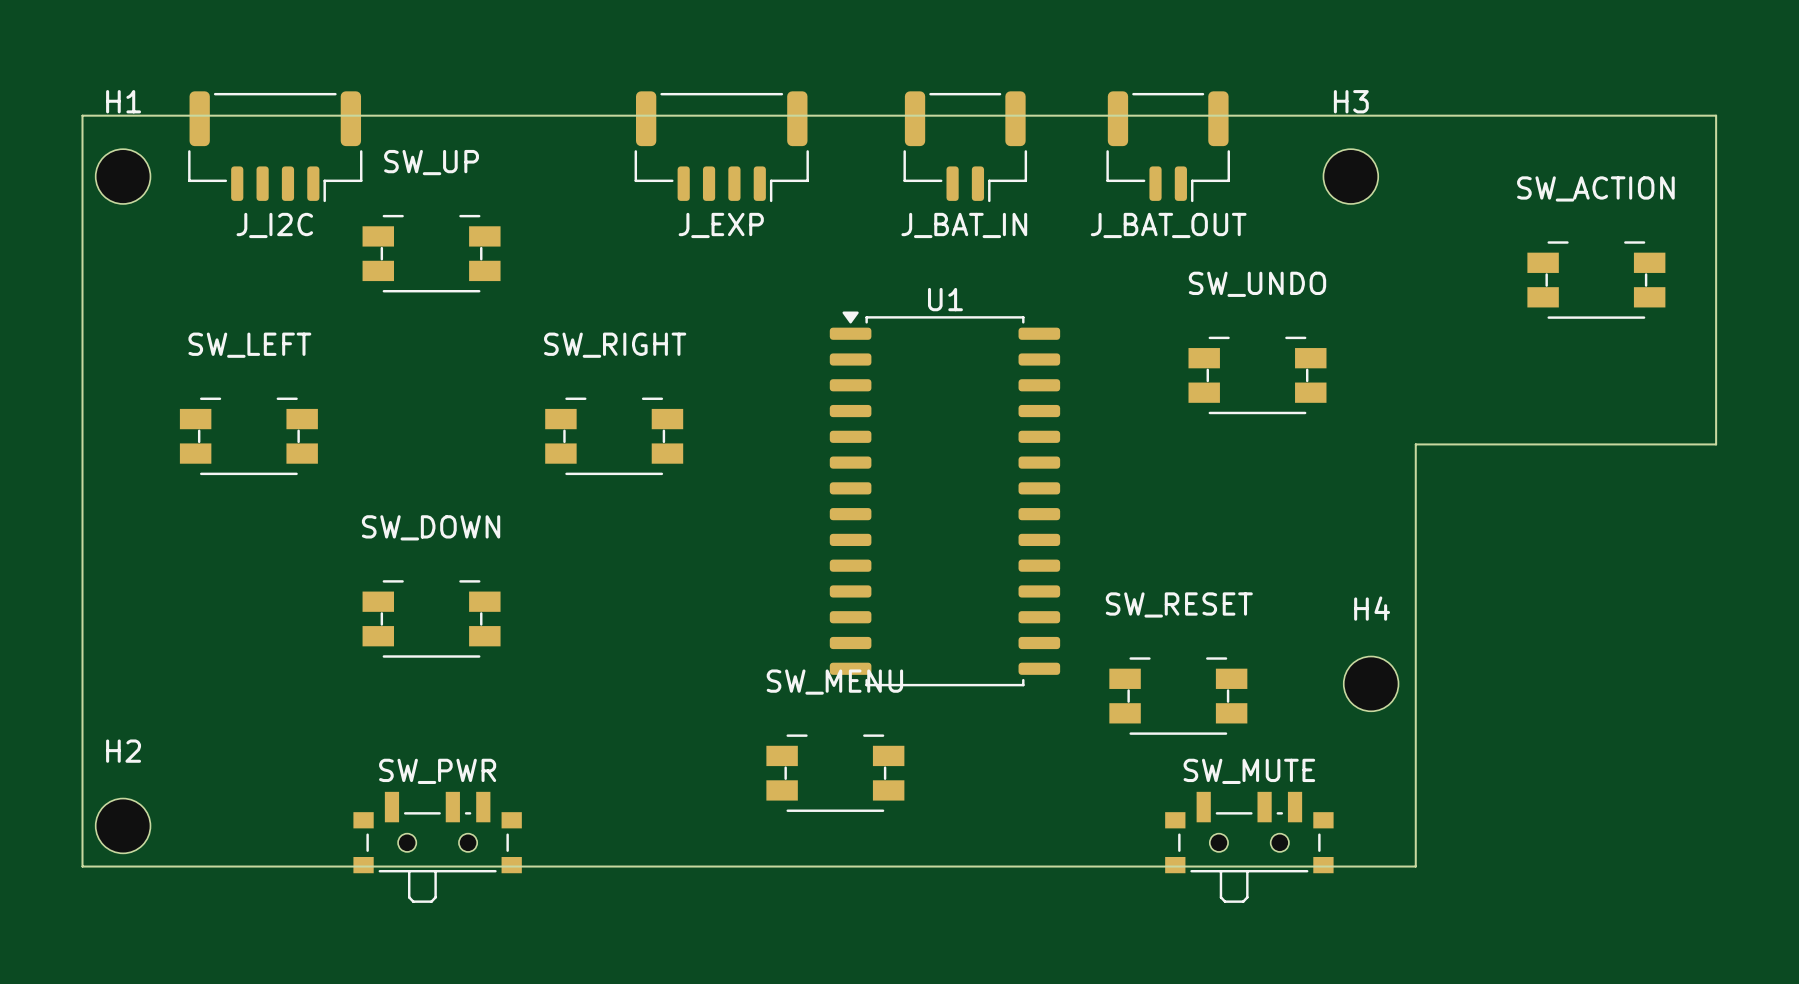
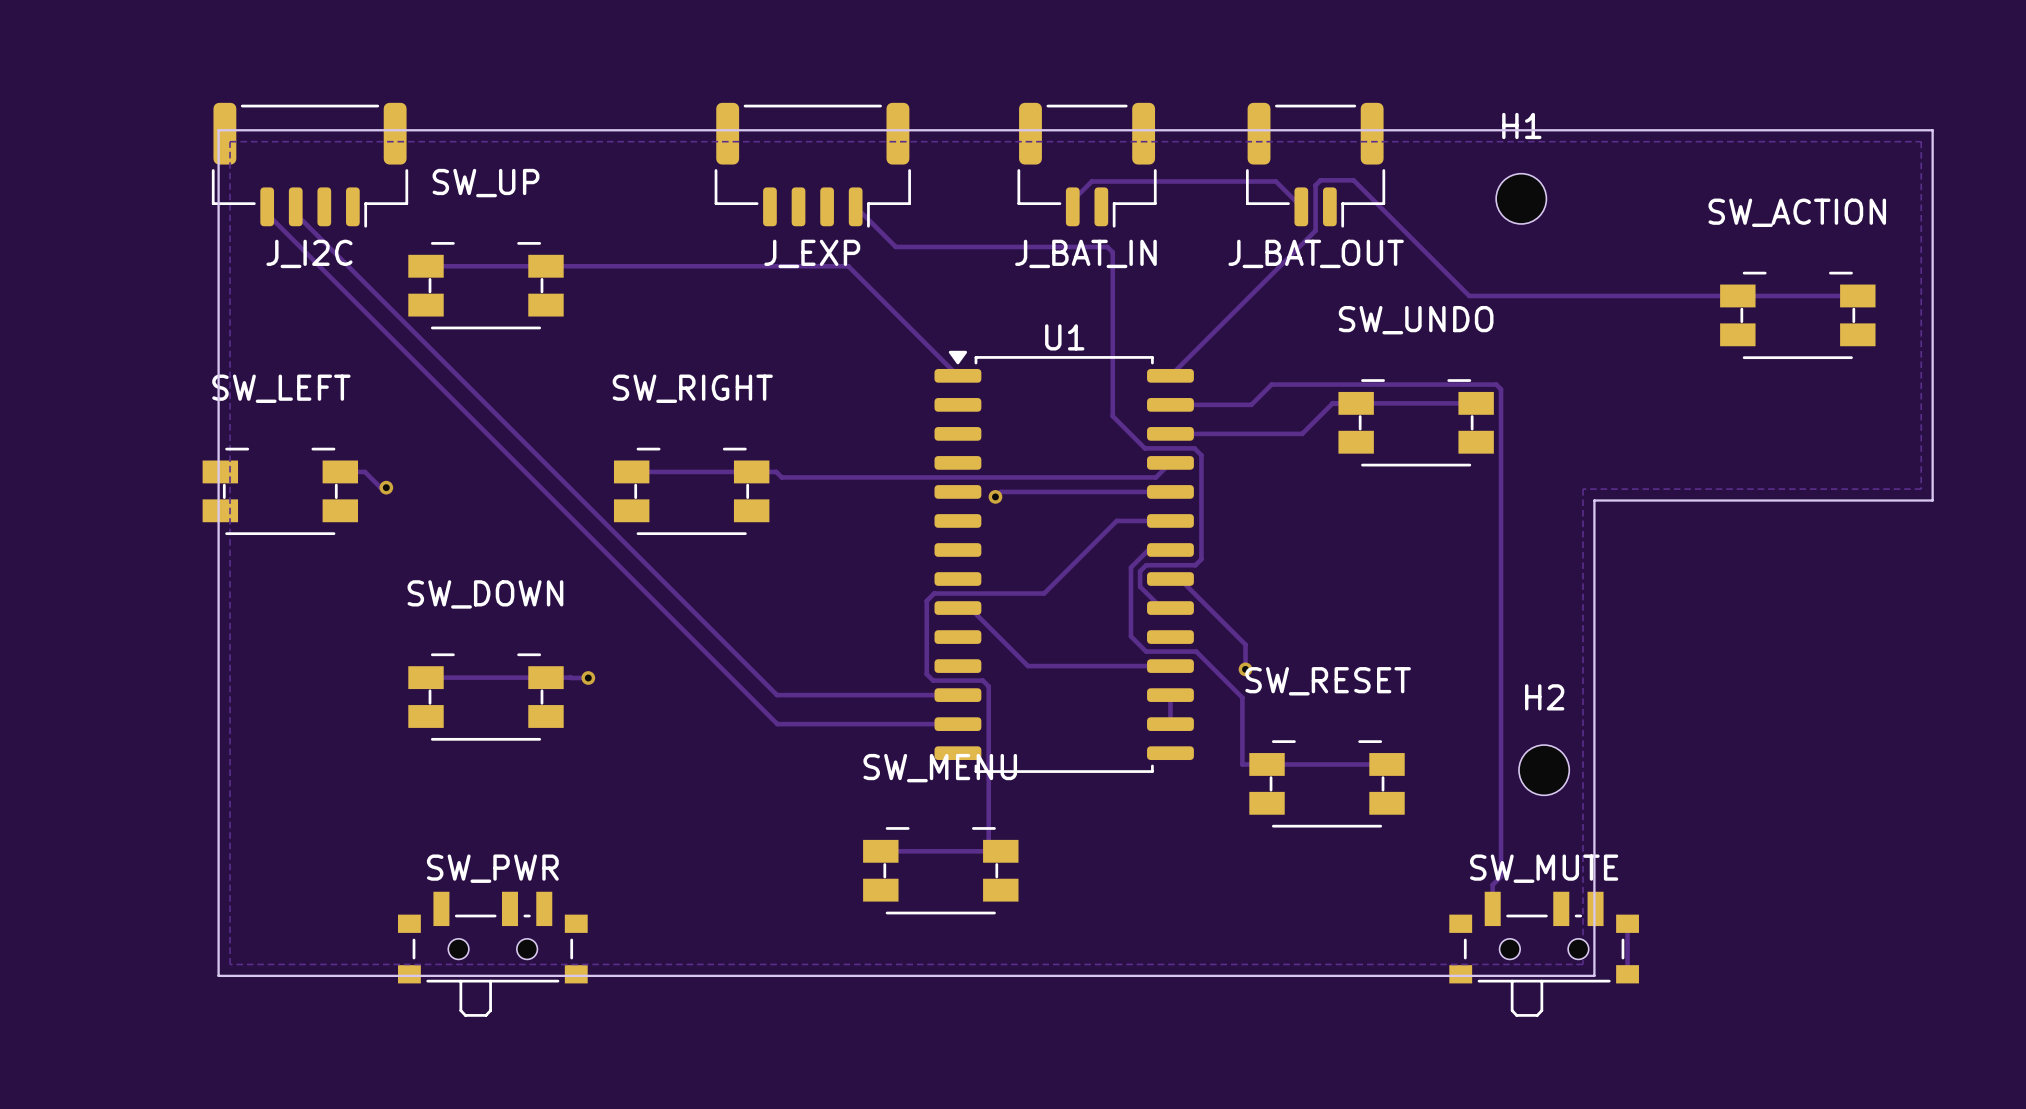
board edge: (194, 115) (82, 115) (82, 866) (194, 866) -> (218, 130) (218, 975)
zone outline: none -> (230, 141) (1921, 141) (1921, 489) (1582, 489) (1582, 964) (230, 964) (230, 141)
H1 footprint: [95, 149, 151, 204] -> [1496, 173, 1547, 224]
H3: (1350, 176) -> none
track: none -> (267, 206) (267, 213) (777, 724) (957, 724)
track: none -> (295, 206) (295, 213) (777, 695) (957, 695)
track: none -> (855, 206) (895, 246) (1107, 246) (1112, 252) (1112, 416) (1144, 448) (1194, 448) (1201, 455) (1201, 559) (1195, 565) (1146, 565) (1140, 571) (1140, 586) (1161, 608) (1170, 608)
track: none -> (1072, 206) (1072, 200) (1091, 181) (1275, 181) (1301, 206)
track: none -> (426, 266) (848, 266) (957, 375)
track: none -> (1857, 295) (1469, 295) (1353, 180) (1320, 180) (1315, 185) (1315, 230) (1170, 375)
track: none -> (1476, 403) (1332, 403) (1302, 433) (1170, 433)
track: none -> (1170, 404) (1251, 404) (1271, 384) (1496, 384) (1501, 389) (1501, 876) (1492, 884) (1492, 908)
track: none -> (1170, 462) (1155, 477) (781, 477) (776, 471) (631, 471)
track: none -> (340, 471) (364, 471) (380, 487) (386, 487)
via: none -> (386, 487)
track: none -> (1170, 491) (1000, 491) (995, 496)
via: none -> (995, 496)
track: none -> (1170, 520) (1116, 520) (1044, 593) (934, 593) (926, 600) (926, 674) (933, 680) (982, 680) (988, 686) (988, 851)
track: none -> (1170, 549) (1148, 549) (1130, 567) (1130, 636) (1146, 651) (1196, 651) (1242, 697) (1242, 764) (1387, 764)
track: none -> (1170, 579) (1179, 579) (1245, 644) (1245, 669)
track: none -> (957, 608) (969, 608) (1027, 666) (1170, 666)
via: none -> (1245, 669)
track: none -> (426, 677) (588, 678)
via: none -> (588, 678)
track: none -> (1170, 695) (1170, 724)
H4: (1371, 683) -> none
track: none -> (880, 851) (1000, 851)
H2 footprint: [95, 798, 151, 854] -> [1518, 745, 1570, 796]
track: none -> (1627, 923) (1627, 974)
SW_MUTE position: (1249, 847) -> (1544, 954)

